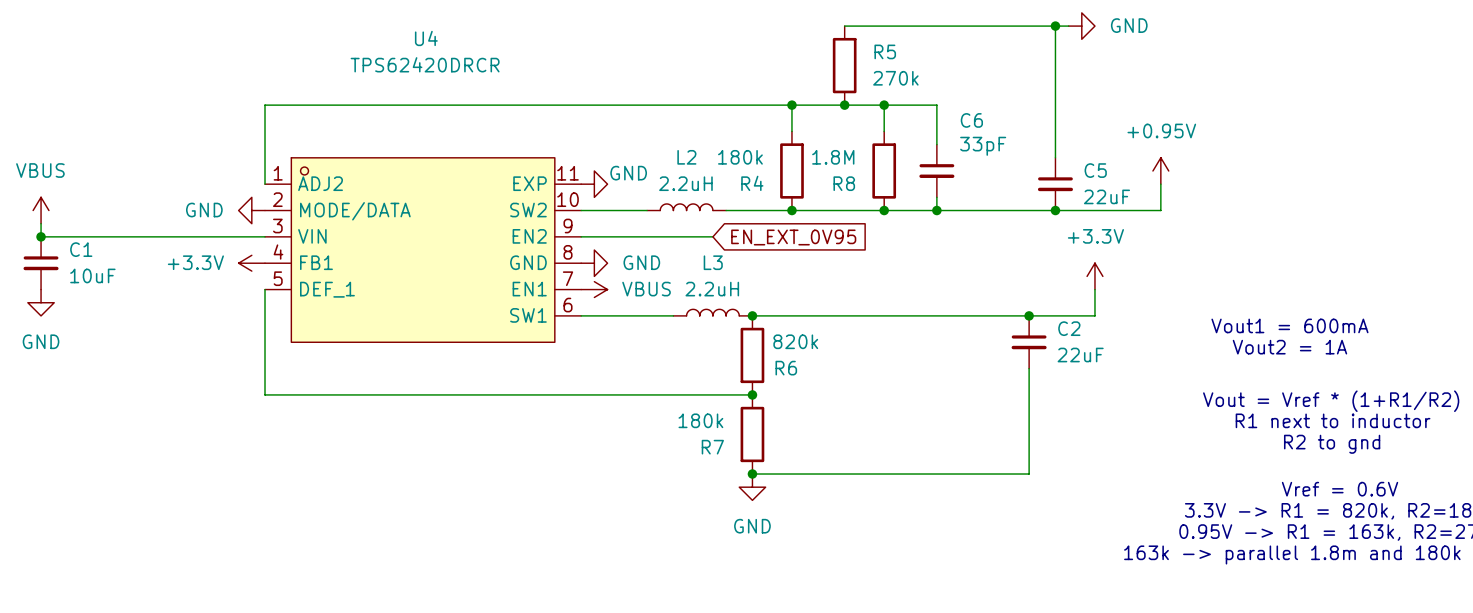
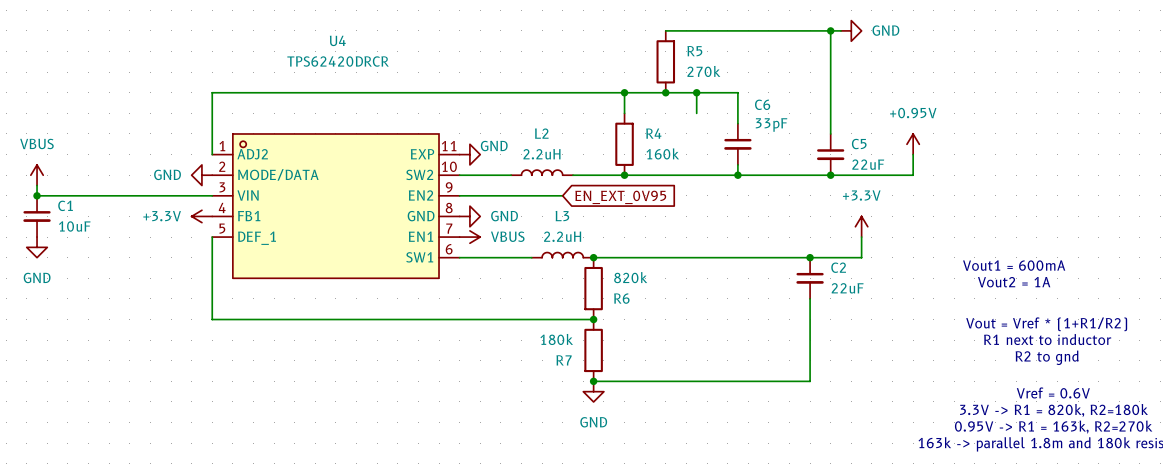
R4 value: 180k (740, 157) -> 160k (662, 153)
R8: 1.8M (884, 170) -> none
R4 name position: R4 (752, 183) -> R4 (653, 133)
junction: (884, 210) -> none

